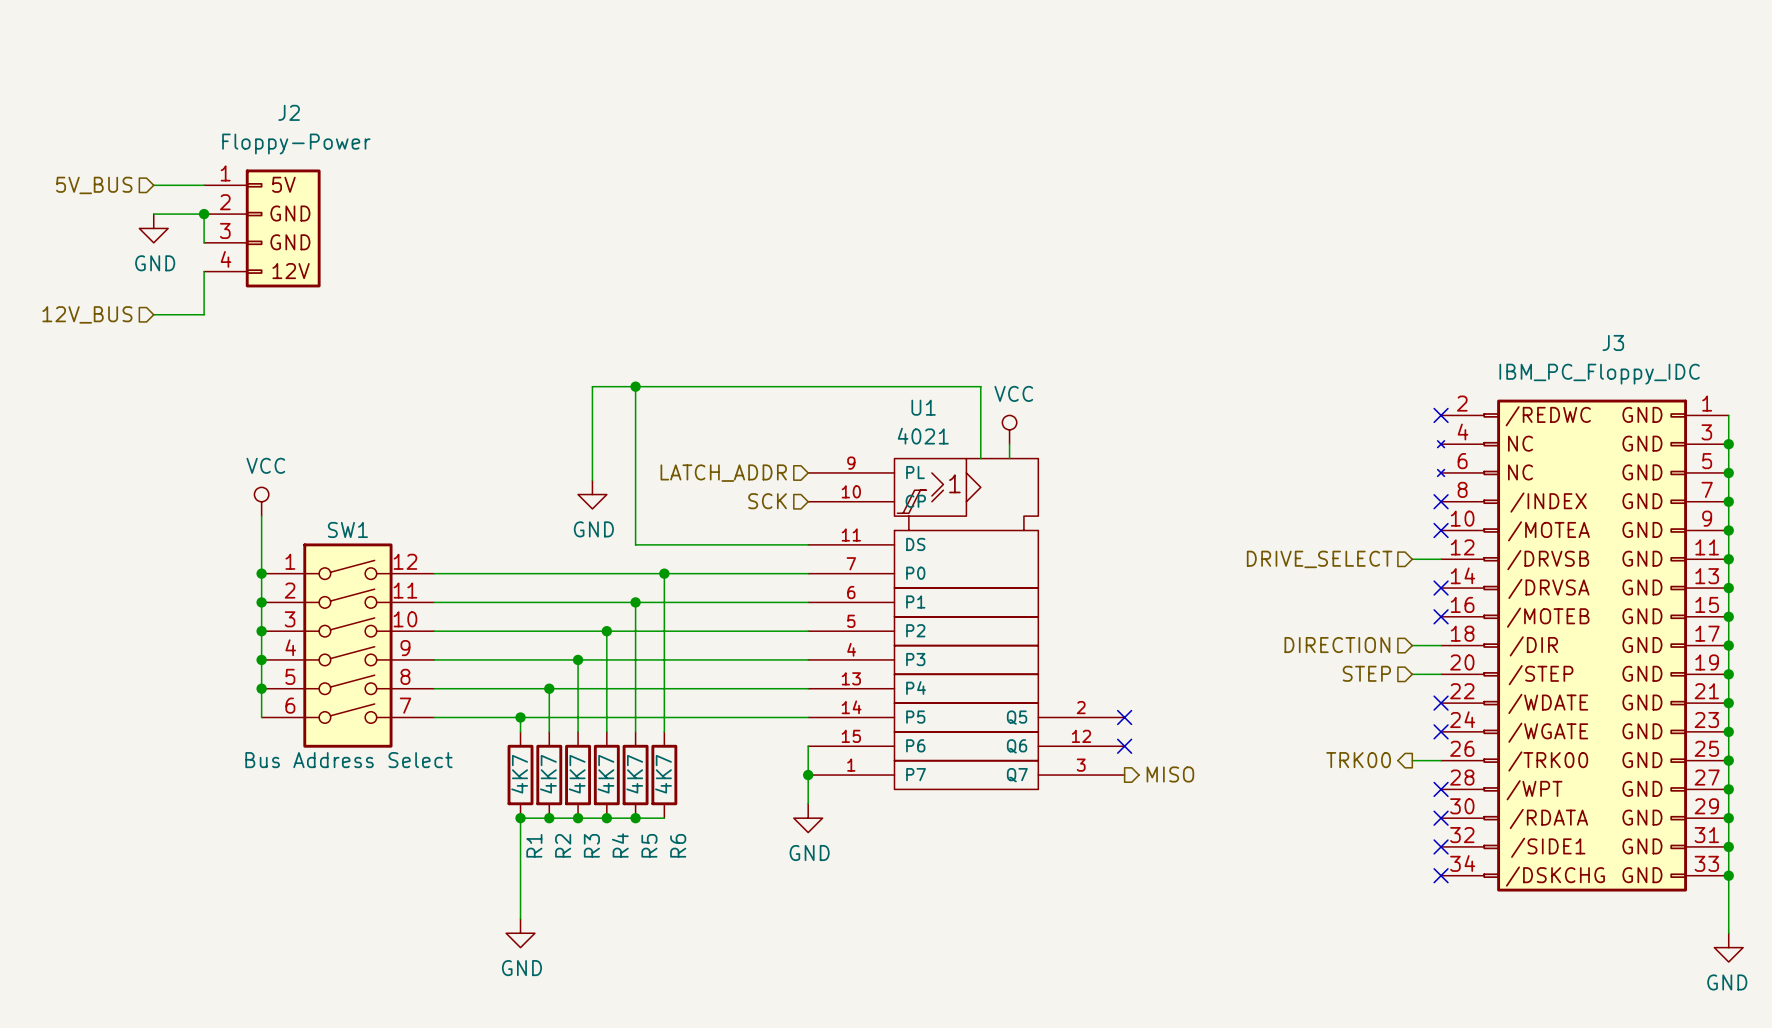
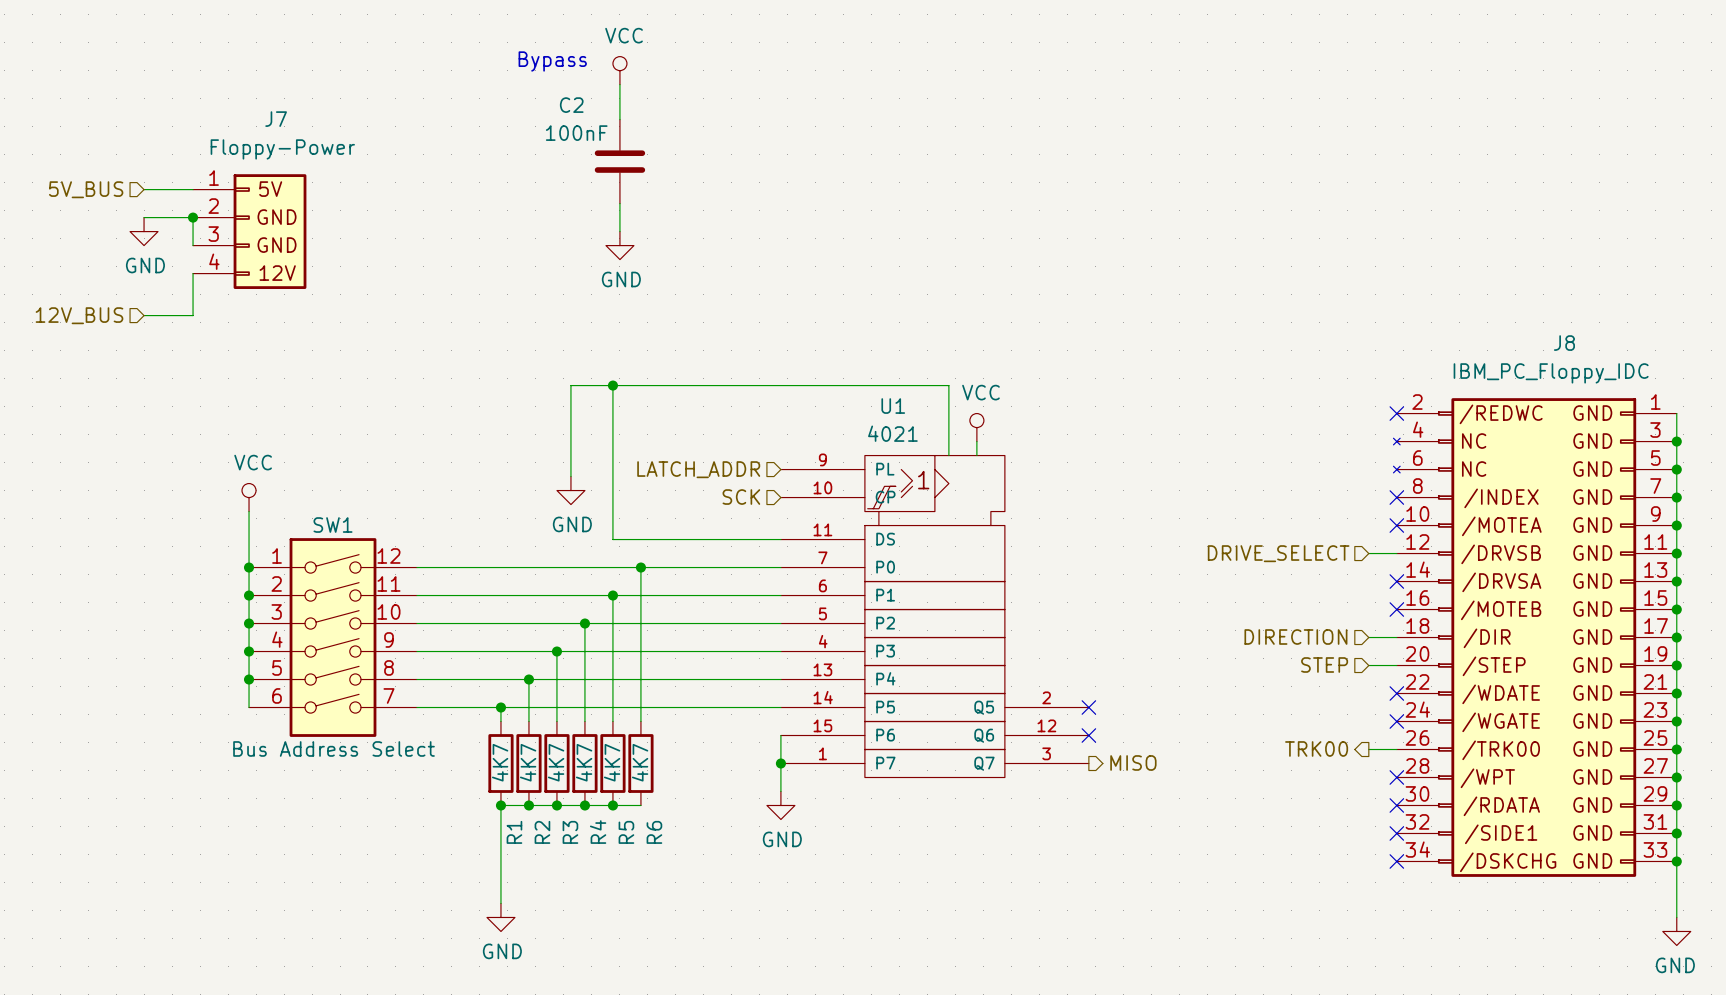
text: none -> Bypass (552, 61)
power symbol: none -> VCC (619, 70)
wire: none -> (619, 84) (619, 119)
J2 name: J2 (289, 112) -> J7 (276, 119)
C2: none -> 100nF (619, 161)
wire: none -> (619, 203) (619, 231)
power symbol: none -> GND (619, 245)
J3 name: J3 (1613, 342) -> J8 (1564, 343)

